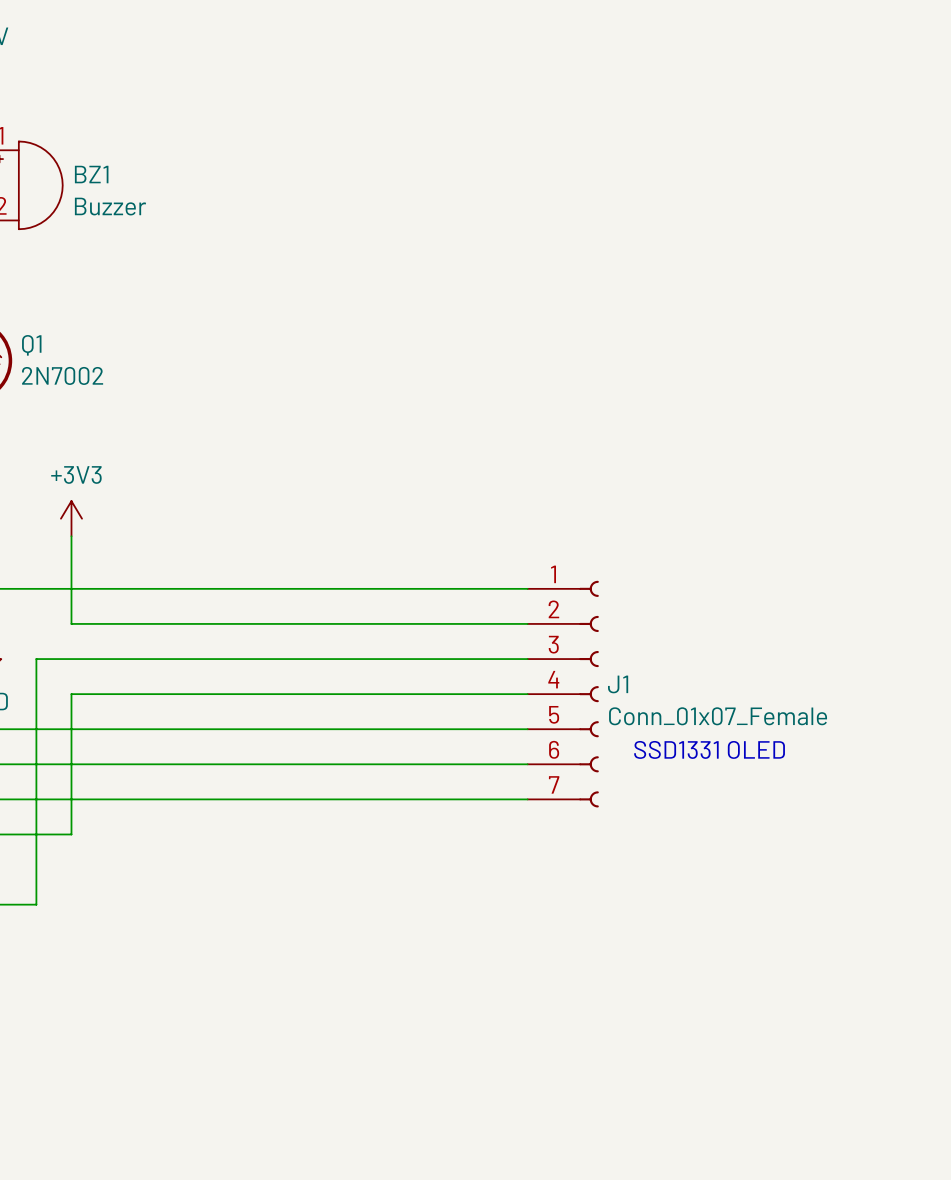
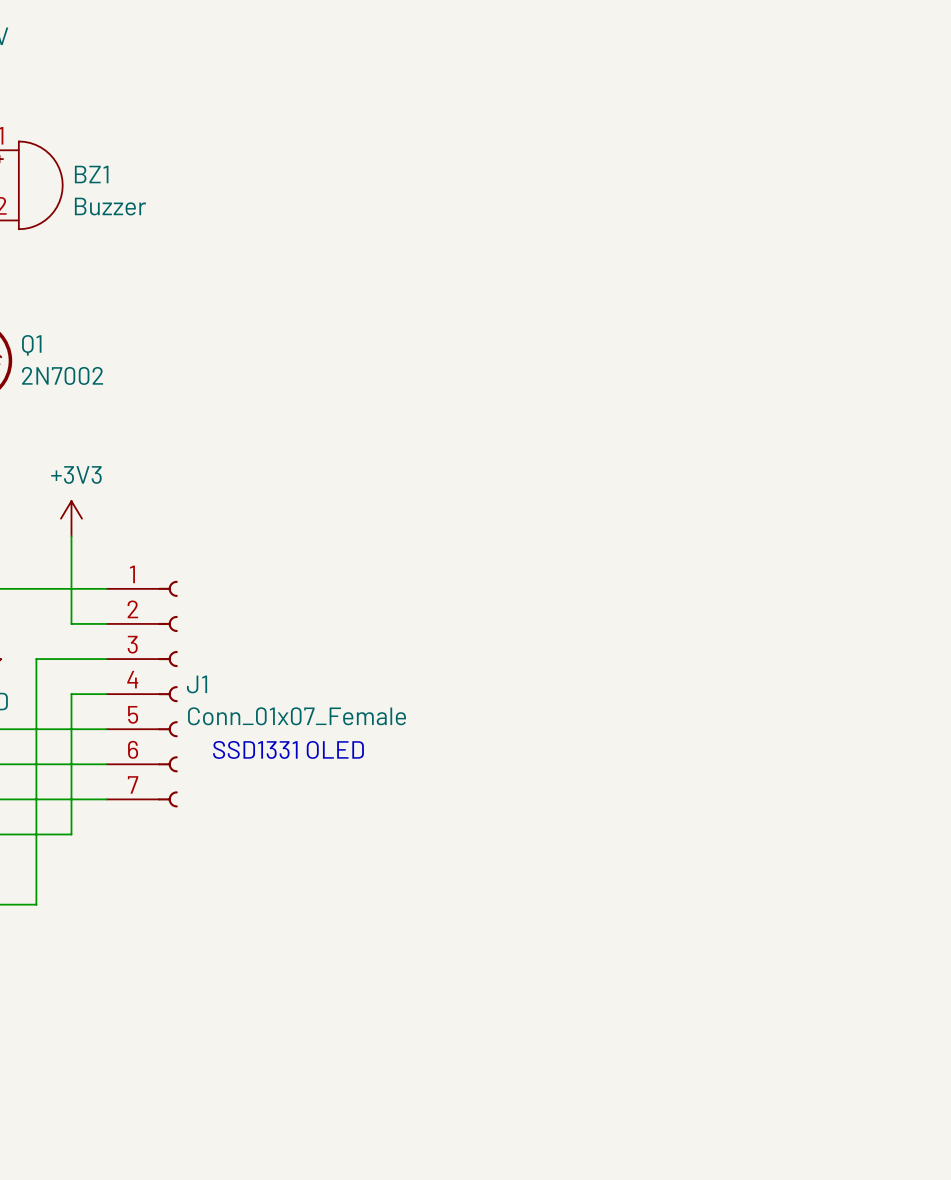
wire: (106, 588) (527, 588) -> none
wire: (106, 623) (527, 623) -> none
wire: (106, 659) (527, 659) -> none
wire: (106, 694) (527, 694) -> none
J1 position: (563, 694) -> (142, 694)
wire: (106, 729) (527, 729) -> none
text: none -> SSD1331 OLED (288, 749)
text: SSD1331 OLED (709, 749) -> none
wire: (106, 764) (527, 764) -> none
wire: (106, 799) (527, 799) -> none

